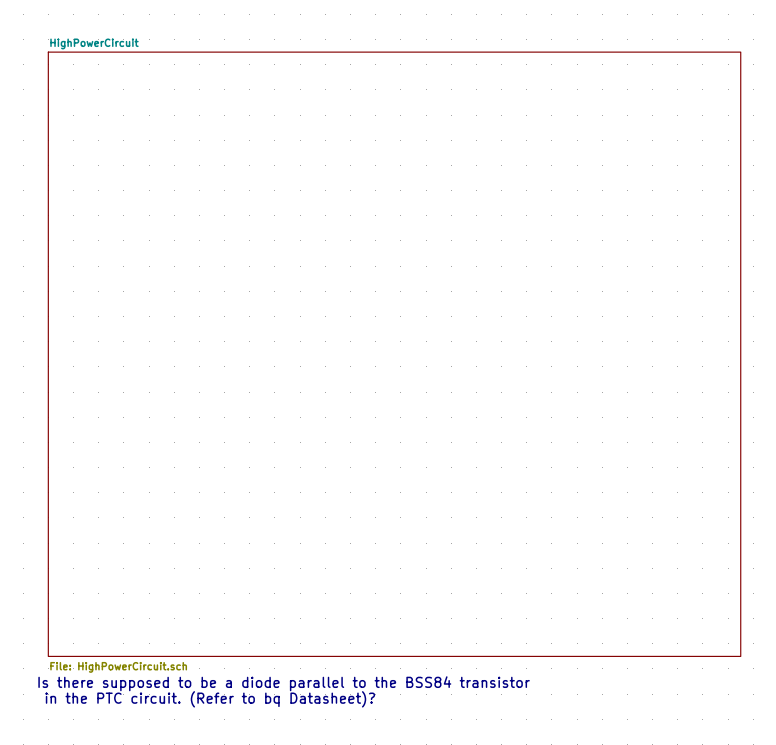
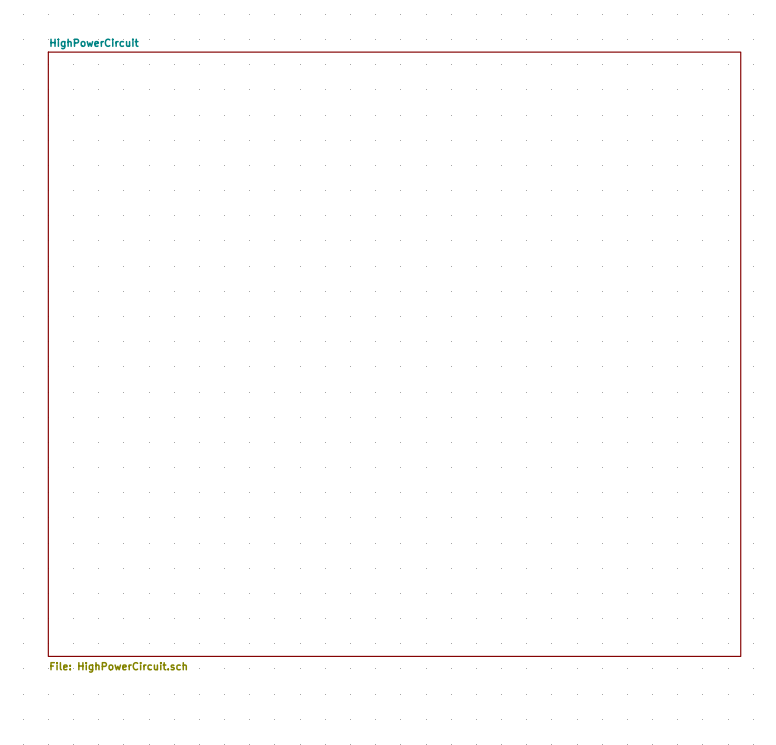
text: Is there supposed to be a diode parallel to the BSS84 transistor (284, 683) -> none
text: in the PTC circuit. (Refer to bq Datasheet)? (210, 699) -> none

